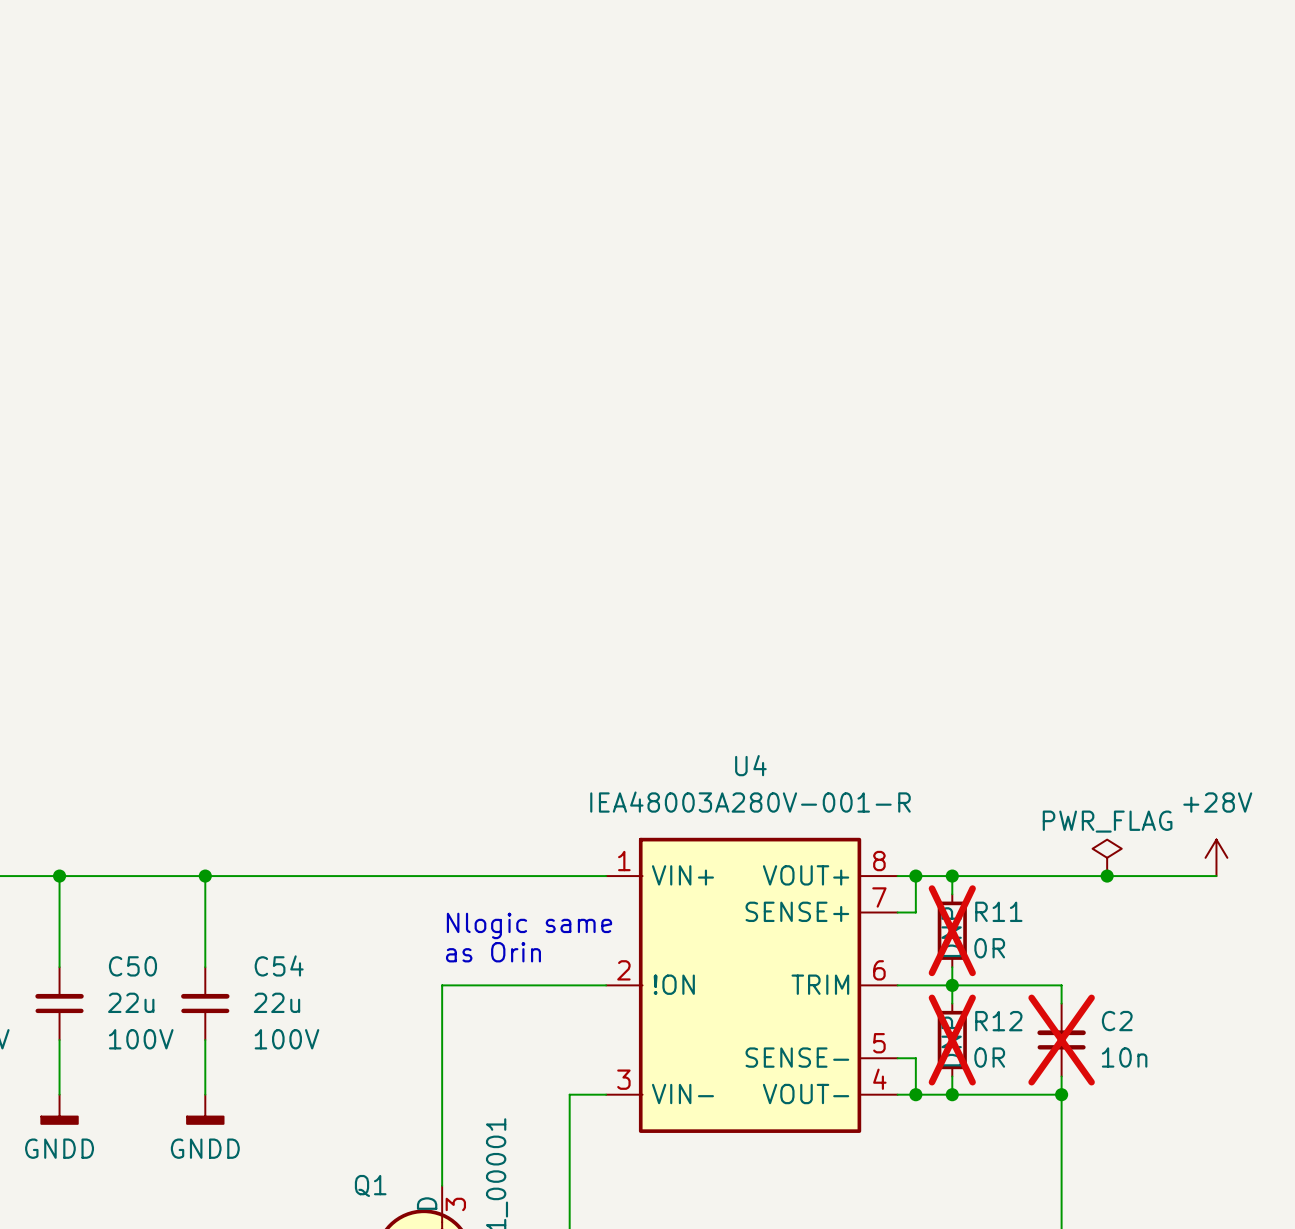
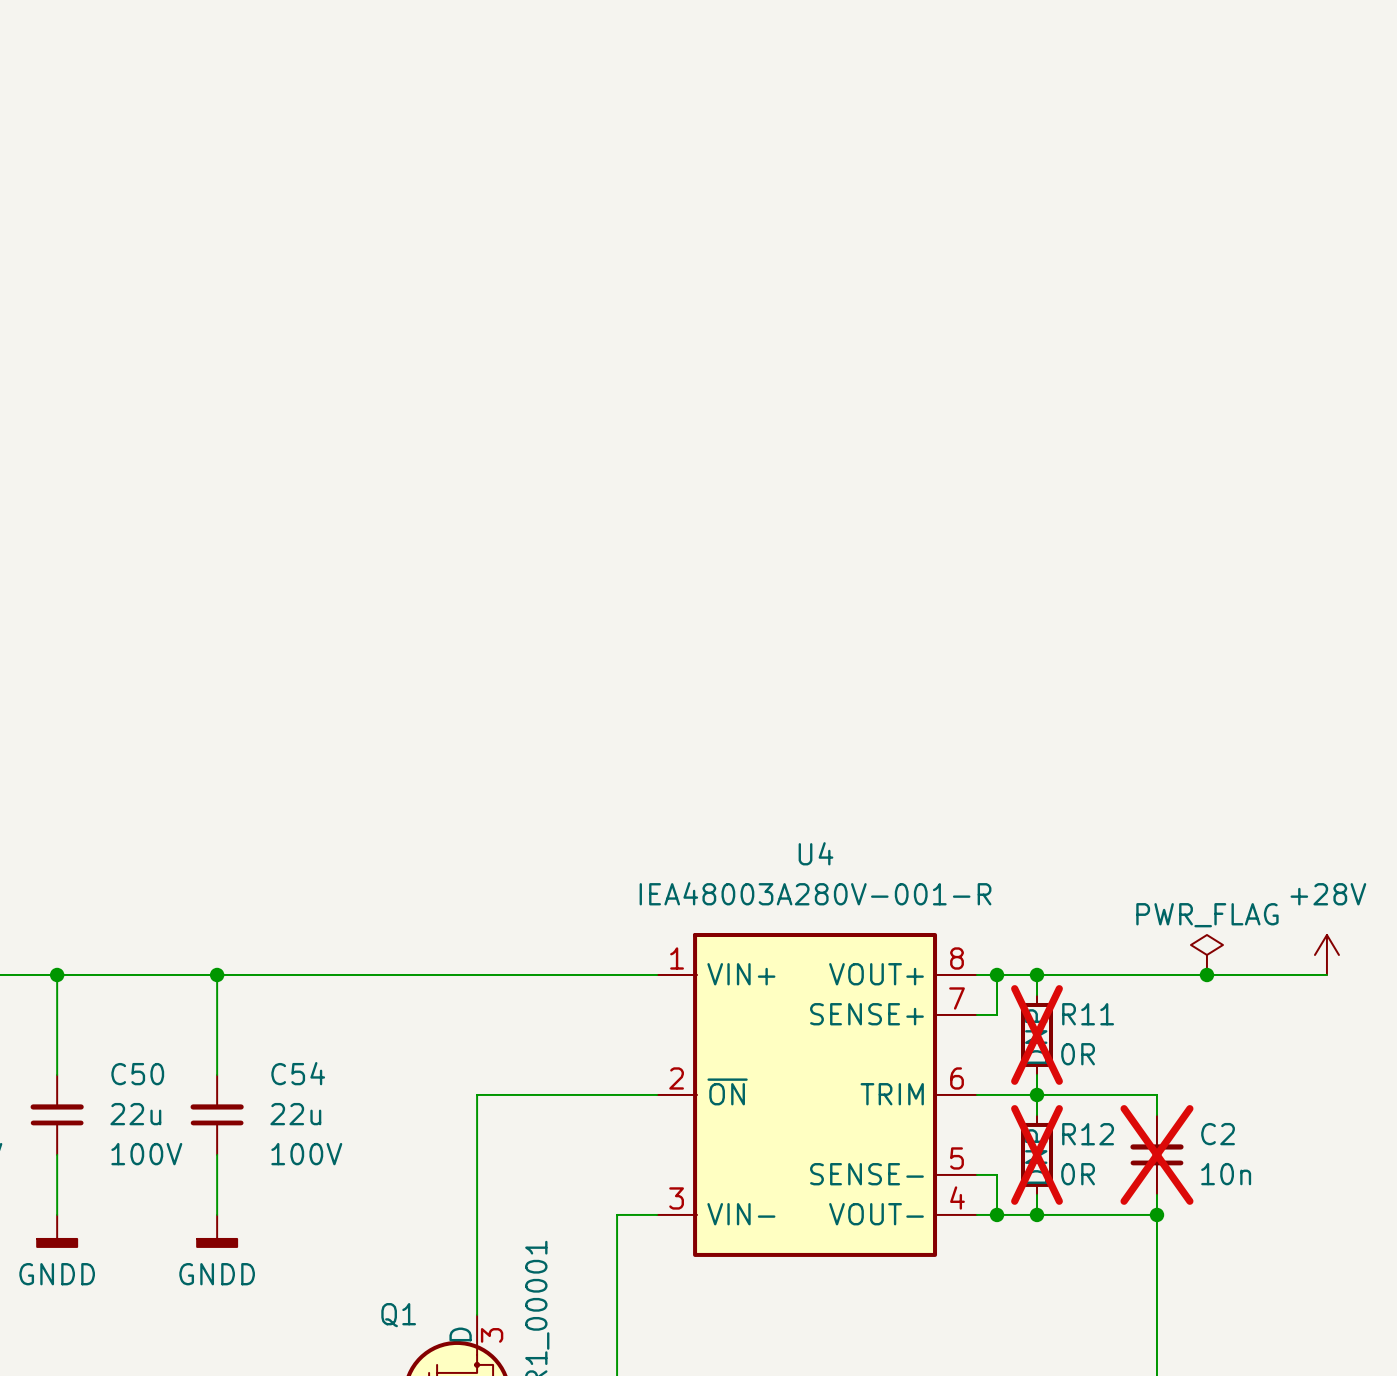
text: Nlogic same (529, 925) -> none
text: as Orin (493, 952) -> none
U4 pin name: !ON (674, 984) -> ~{ON} (727, 1091)

